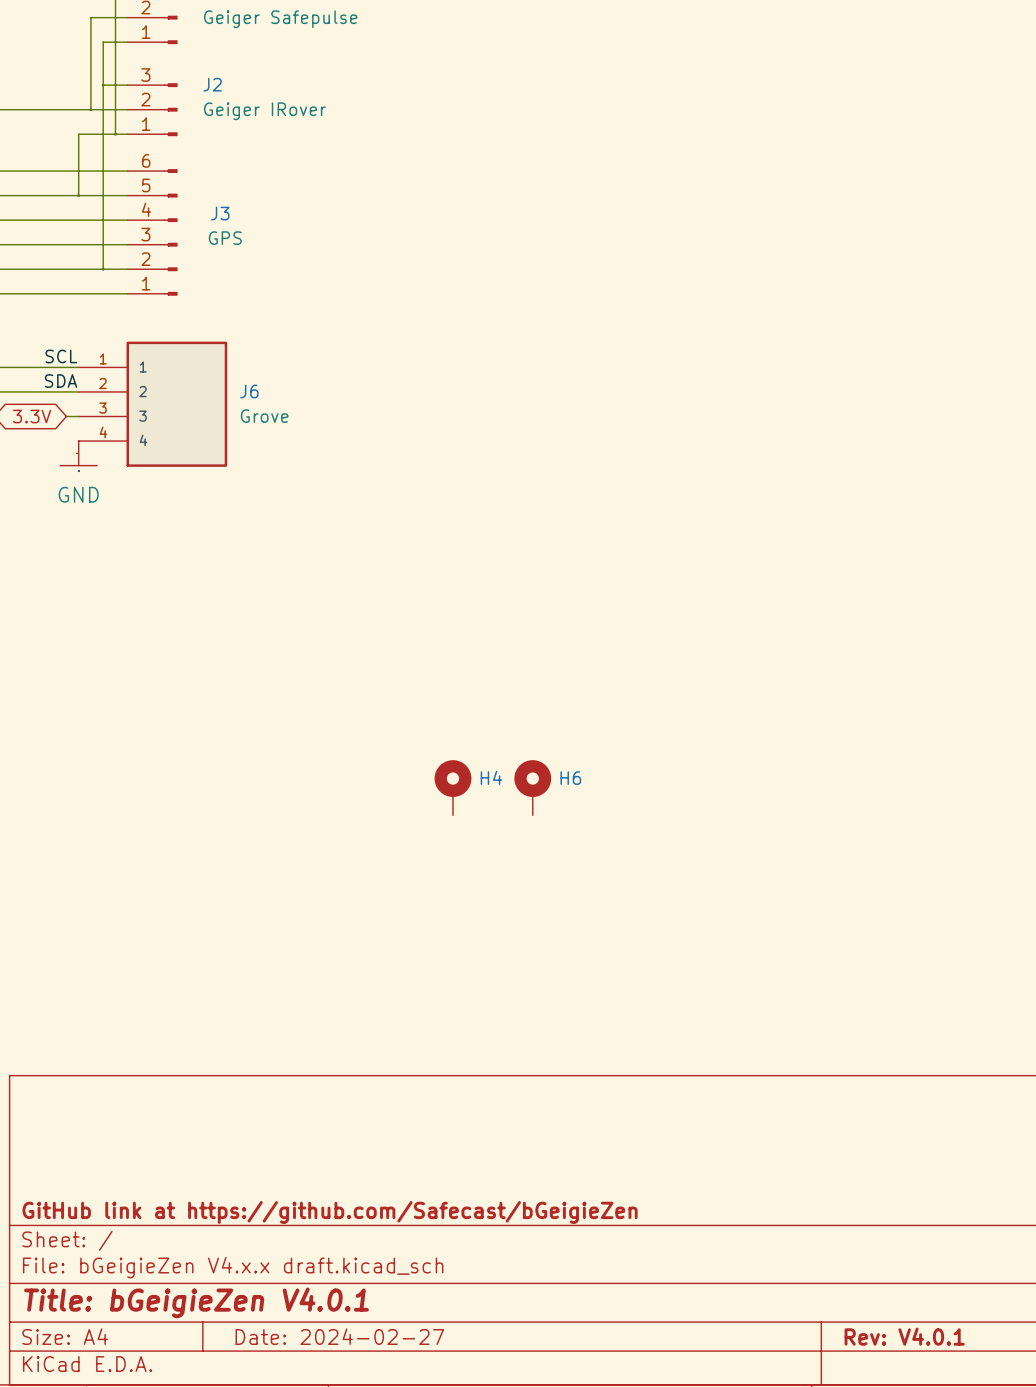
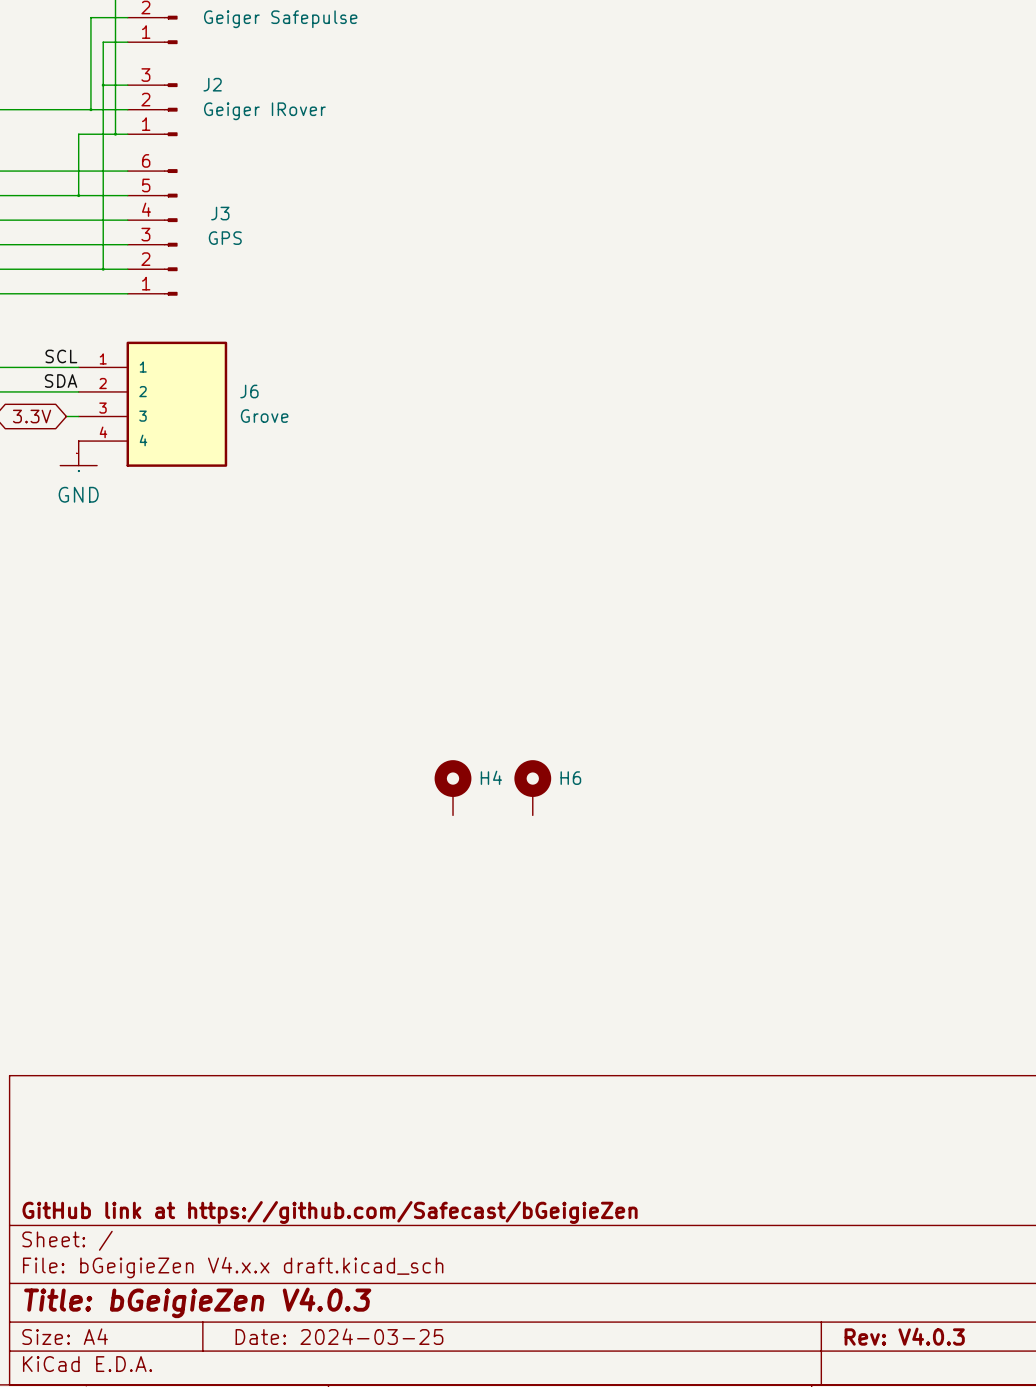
title block: Title: bGeigieZen V4.0.1 (196, 1302) -> Title: bGeigieZen V4.0.3 (197, 1302)
title block: Date: 2024-02-27 (339, 1336) -> Date: 2024-03-25 (339, 1336)
title block: Rev: V4.0.1 (904, 1336) -> Rev: V4.0.3 (904, 1336)

